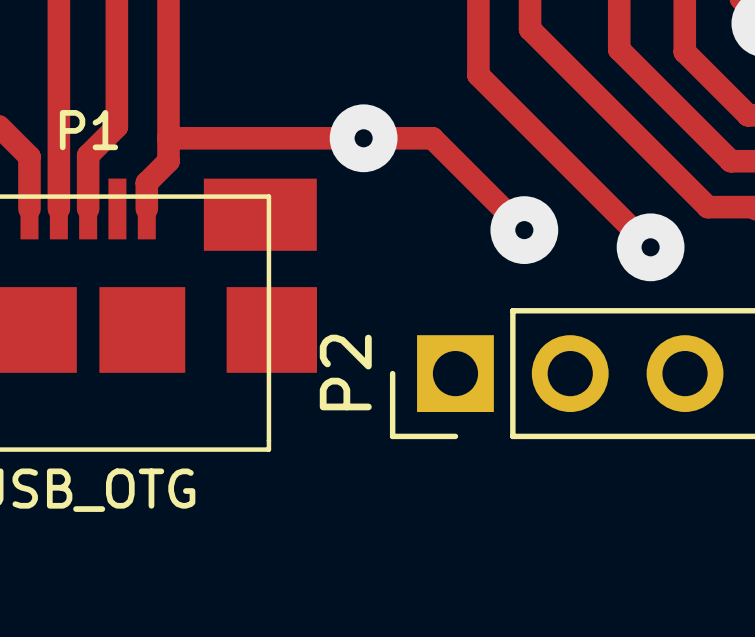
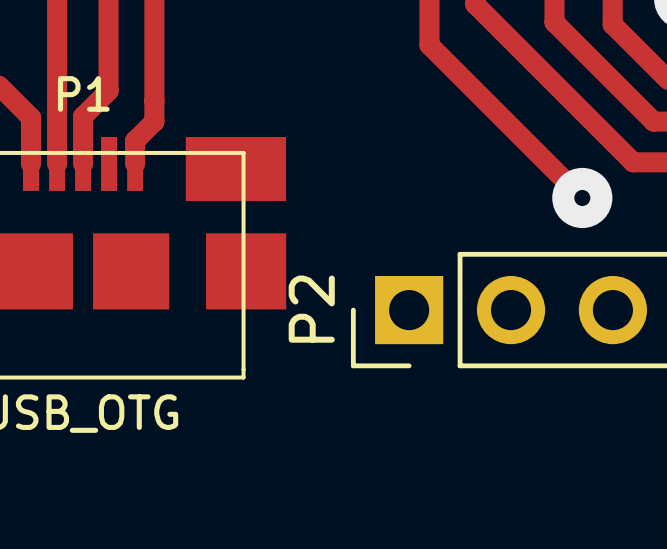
track: (168, 138) (432, 138) (524, 230) -> none
via: (363, 138) -> none
via: (524, 230) -> none

